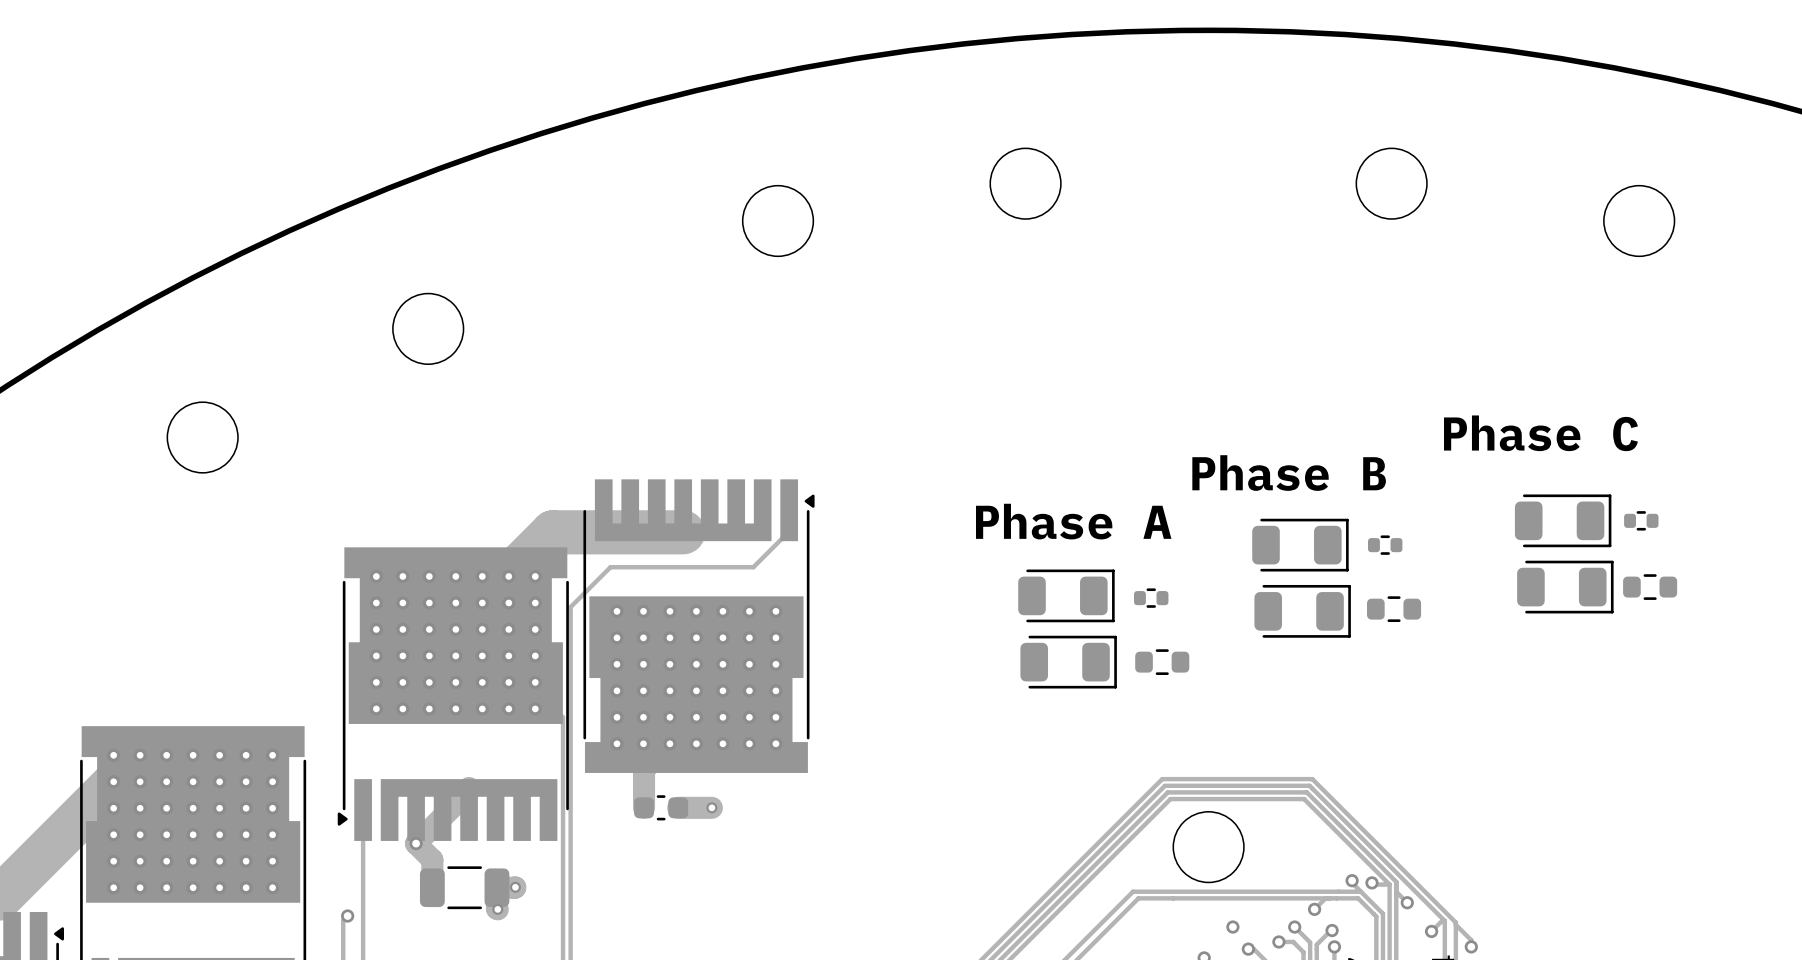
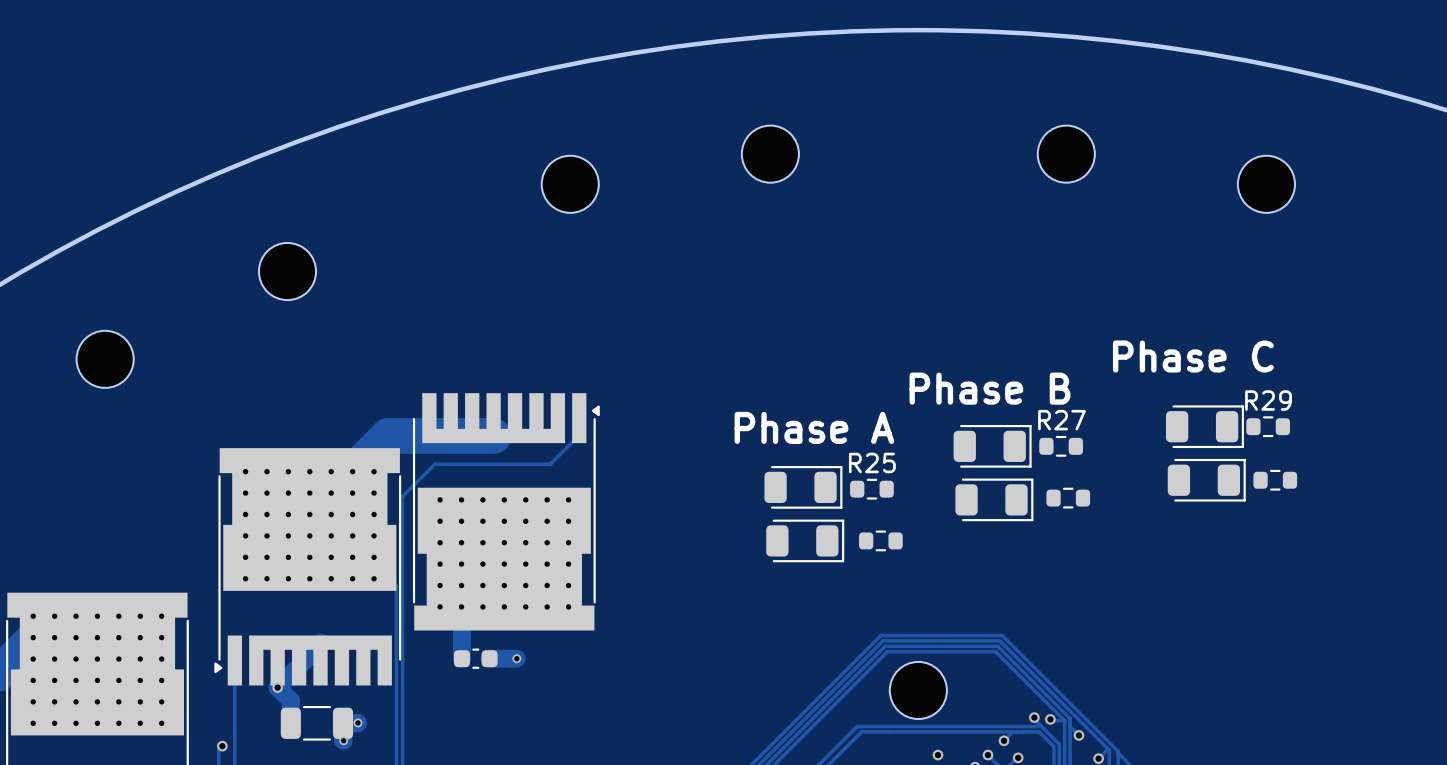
part: (1641, 520) -> none
R29: none -> (1268, 426)
part: (1385, 545) -> none
R27: none -> (1061, 446)
part: (1151, 598) -> none
R25: none -> (871, 489)

